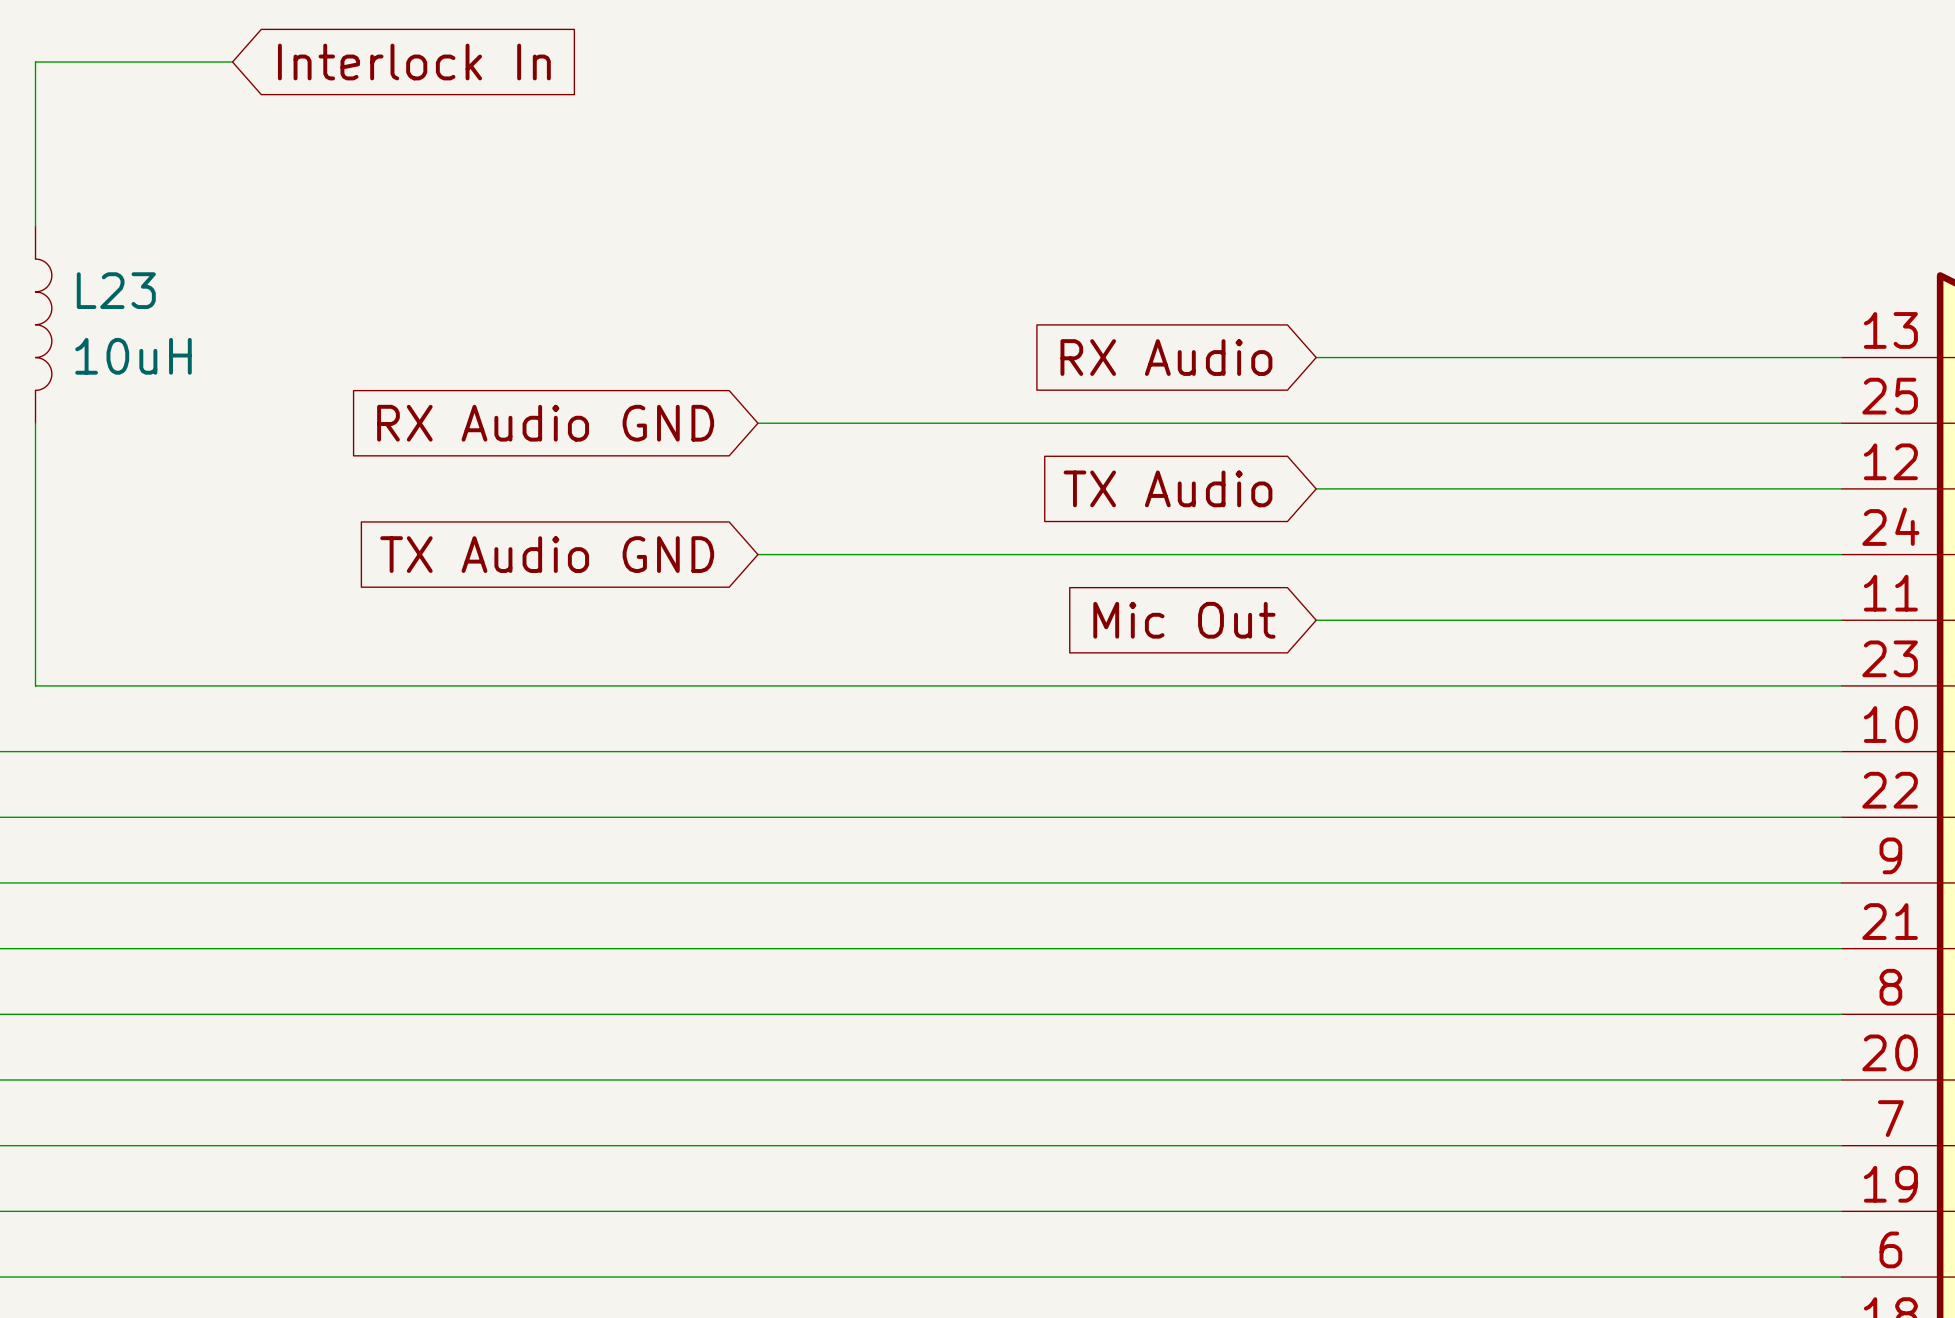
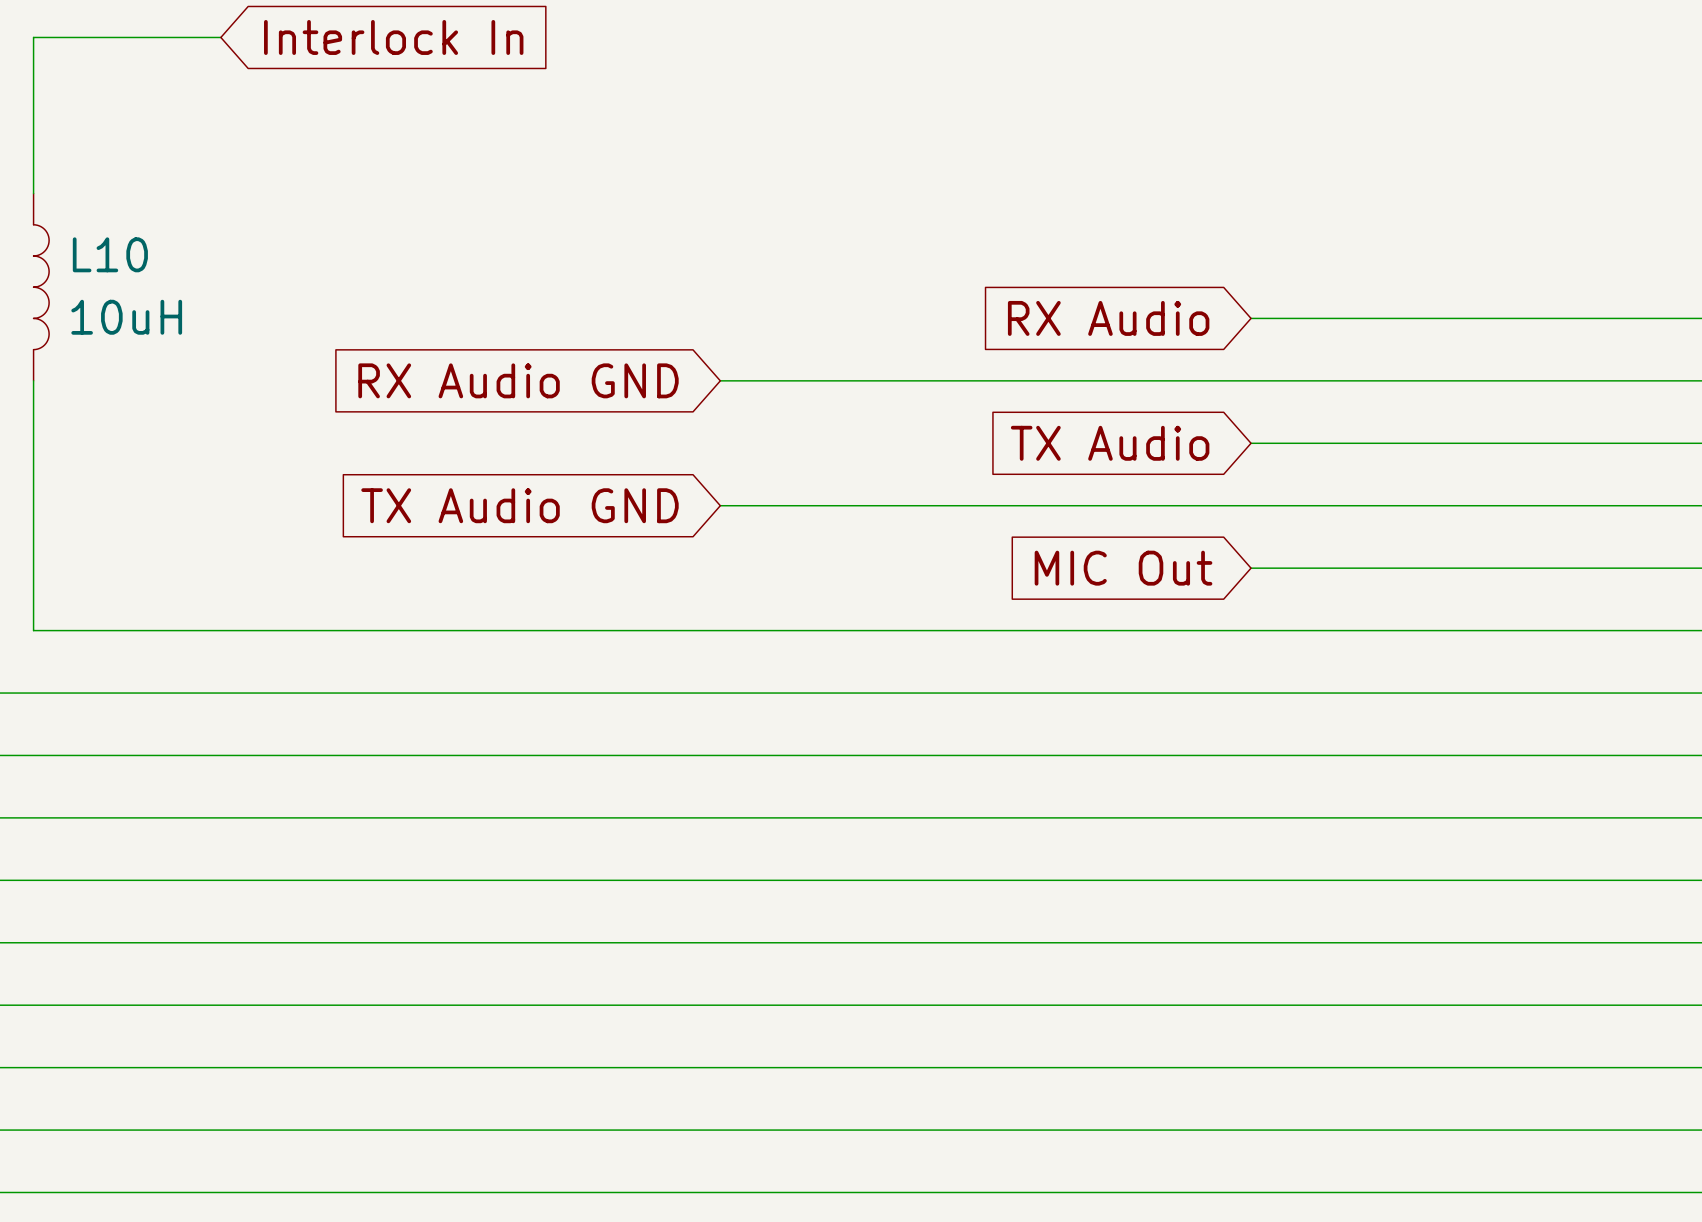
L23 name: L23 (116, 290) -> L10 (110, 254)
global label: Mic Out (1184, 620) -> MIC Out (1123, 568)

